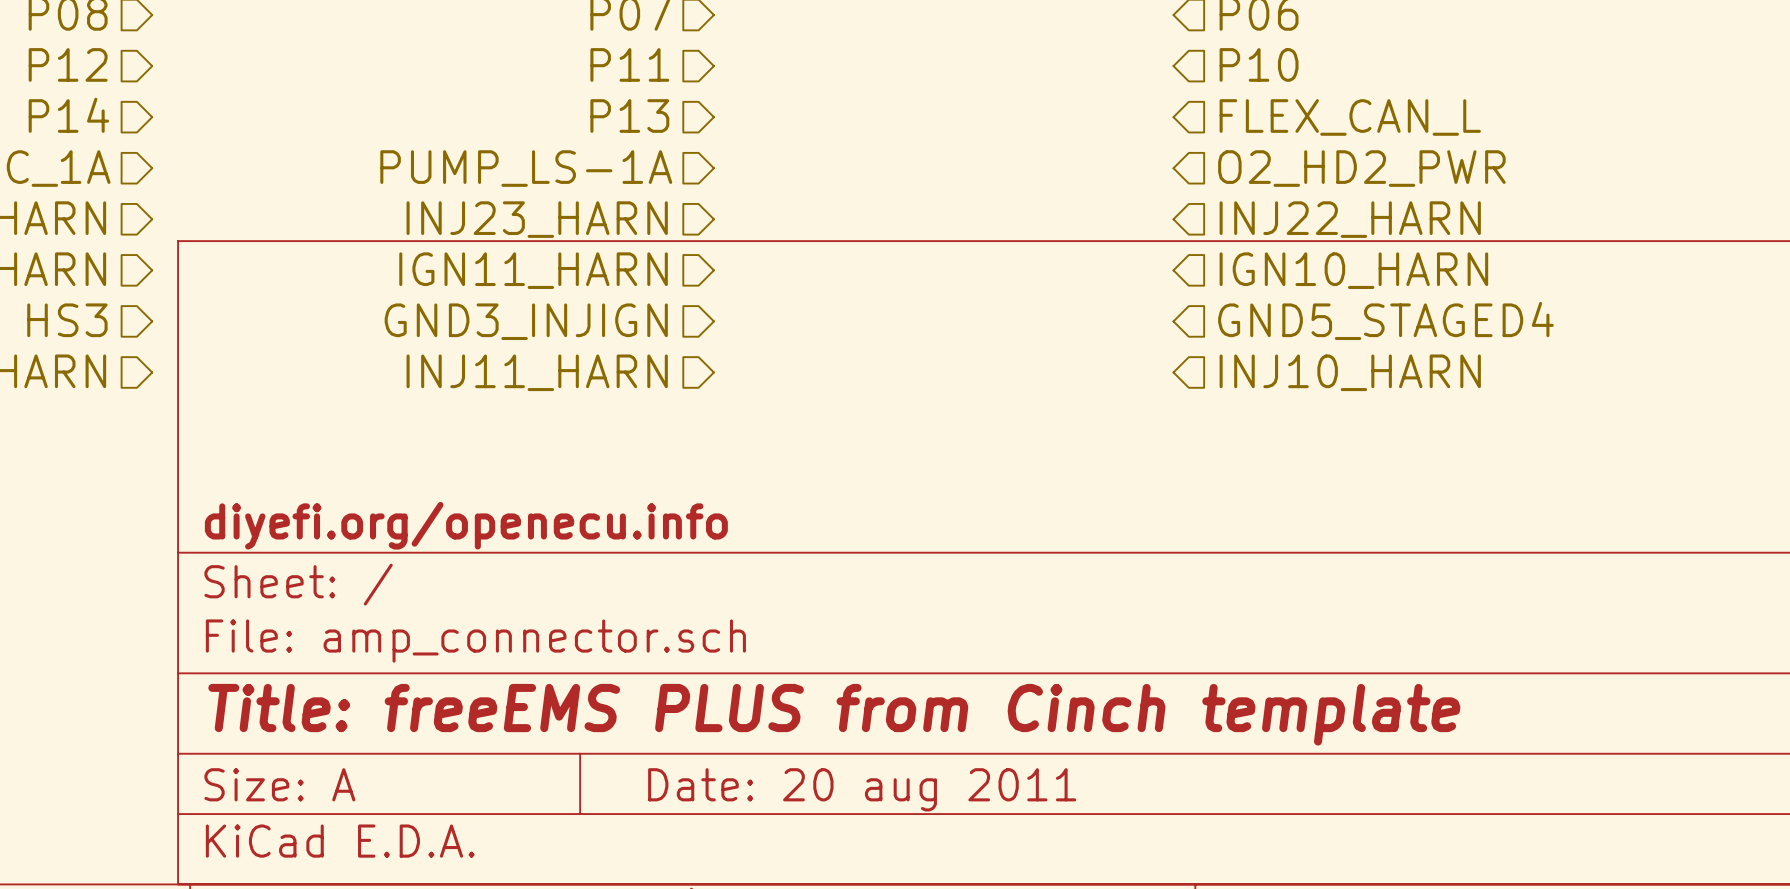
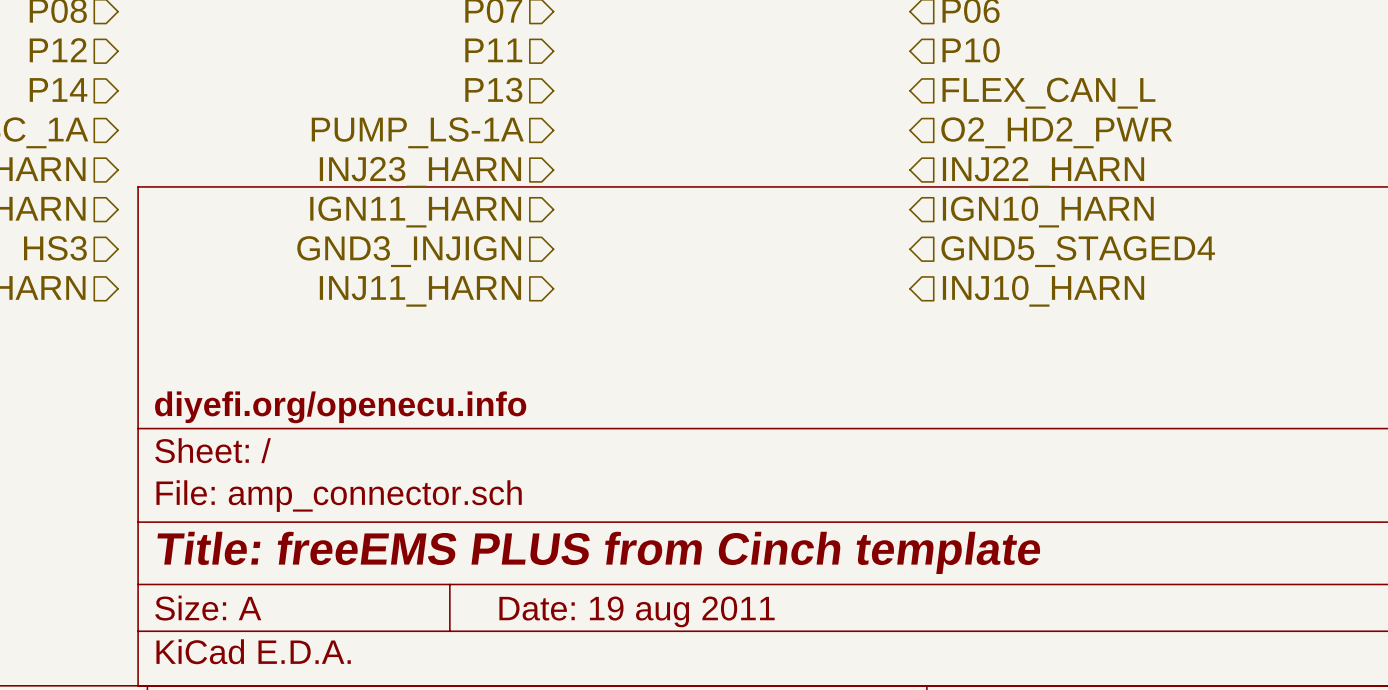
title block: Date: 20 aug 2011 (862, 789) -> Date: 19 aug 2011 (637, 611)

